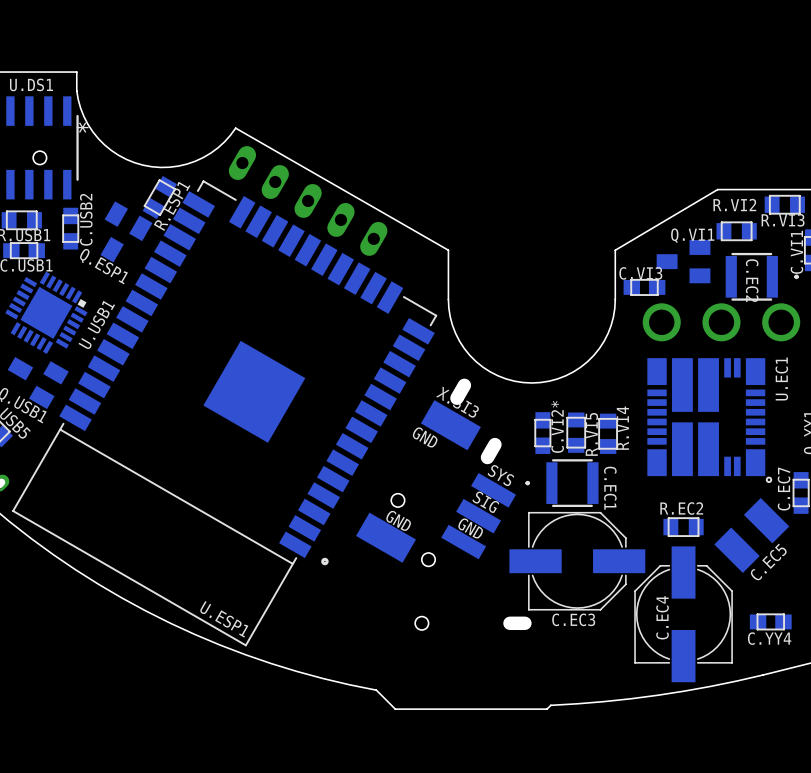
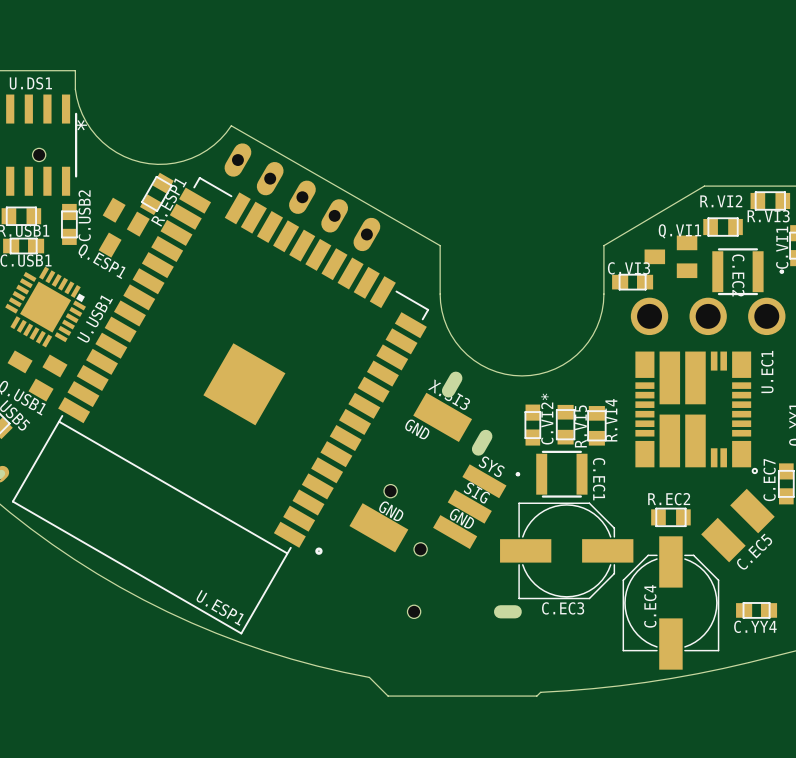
U.ESP1 footprint: [12, 180, 438, 647] -> [11, 177, 430, 635]

